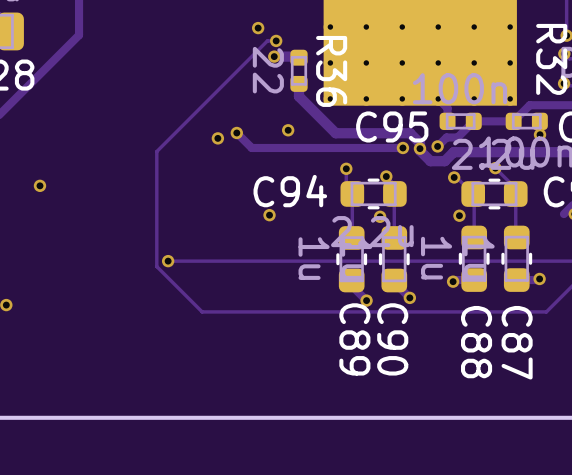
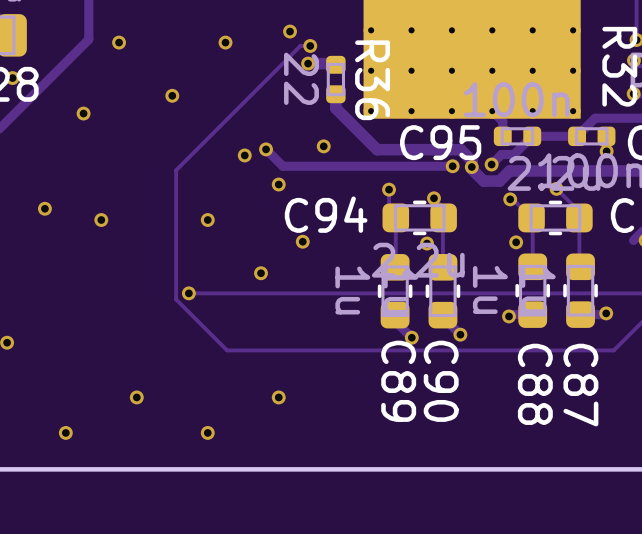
via: none -> (119, 42)
via: none -> (225, 42)
via: none -> (12, 78)
via: none -> (172, 95)
via: none -> (83, 113)
via: none -> (278, 184)
via: none -> (101, 220)
via: none -> (207, 220)
via: none -> (261, 273)
via: none -> (136, 397)
via: none -> (278, 397)
via: none -> (65, 432)
via: none -> (207, 432)

